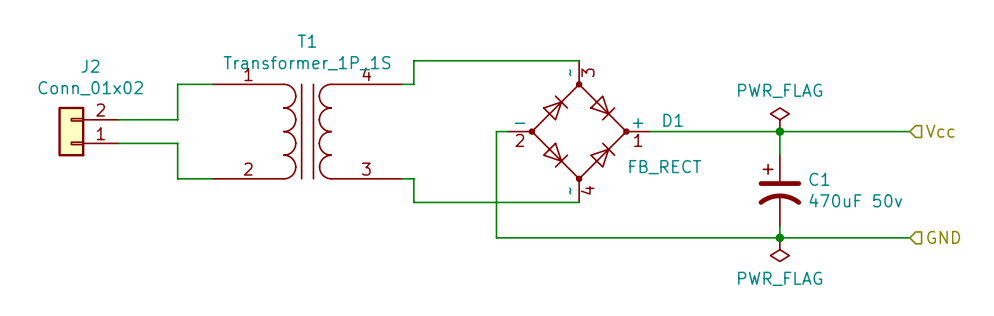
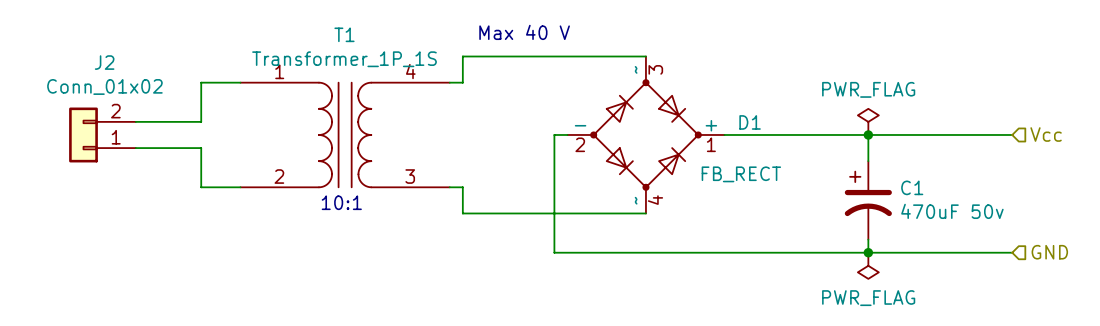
text: none -> Max 40 V (524, 32)
text: none -> 10:1 (341, 202)

